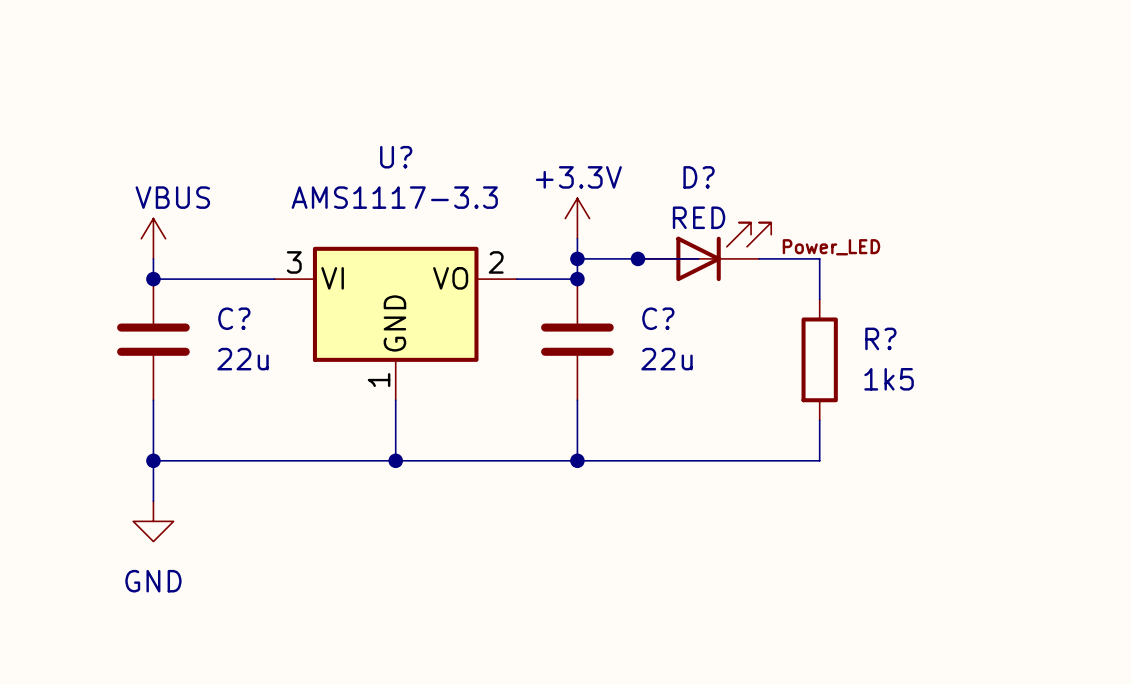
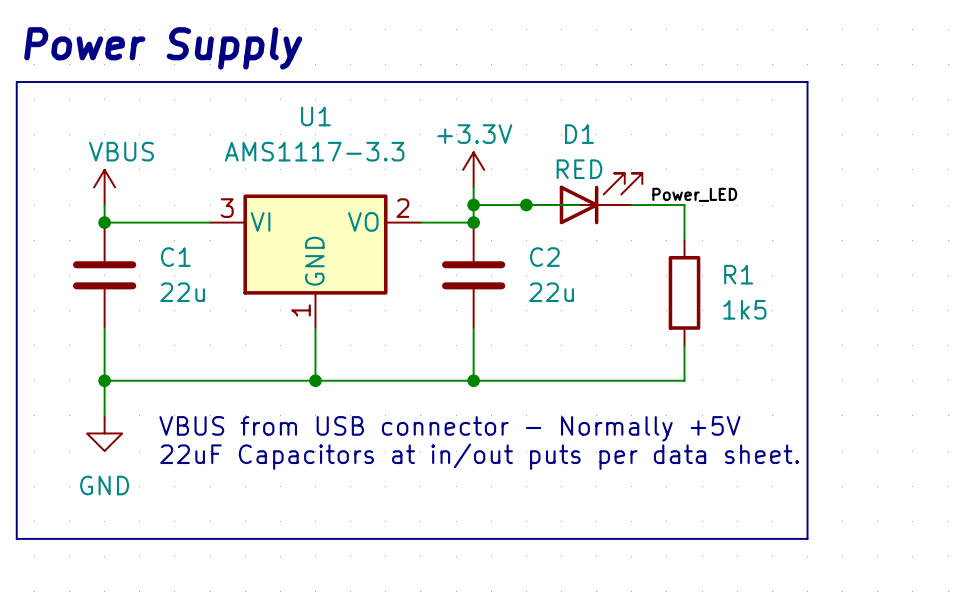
text: none -> Power Supply (163, 48)
line: none -> (16, 82) (16, 538) (807, 538) (807, 82) (16, 82)
U? name: U? (396, 157) -> U1 (315, 116)
D? name: D? (699, 177) -> D1 (579, 134)
C? name: C? (234, 318) -> C1 (175, 257)
C? name: C? (658, 318) -> C2 (544, 257)
R? name: R? (880, 338) -> R1 (738, 274)
text: none -> VBUS from USB connector - Normally +5V (449, 428)
text: none -> 22uF Capacitors at in/out puts per data sheet. (479, 456)

